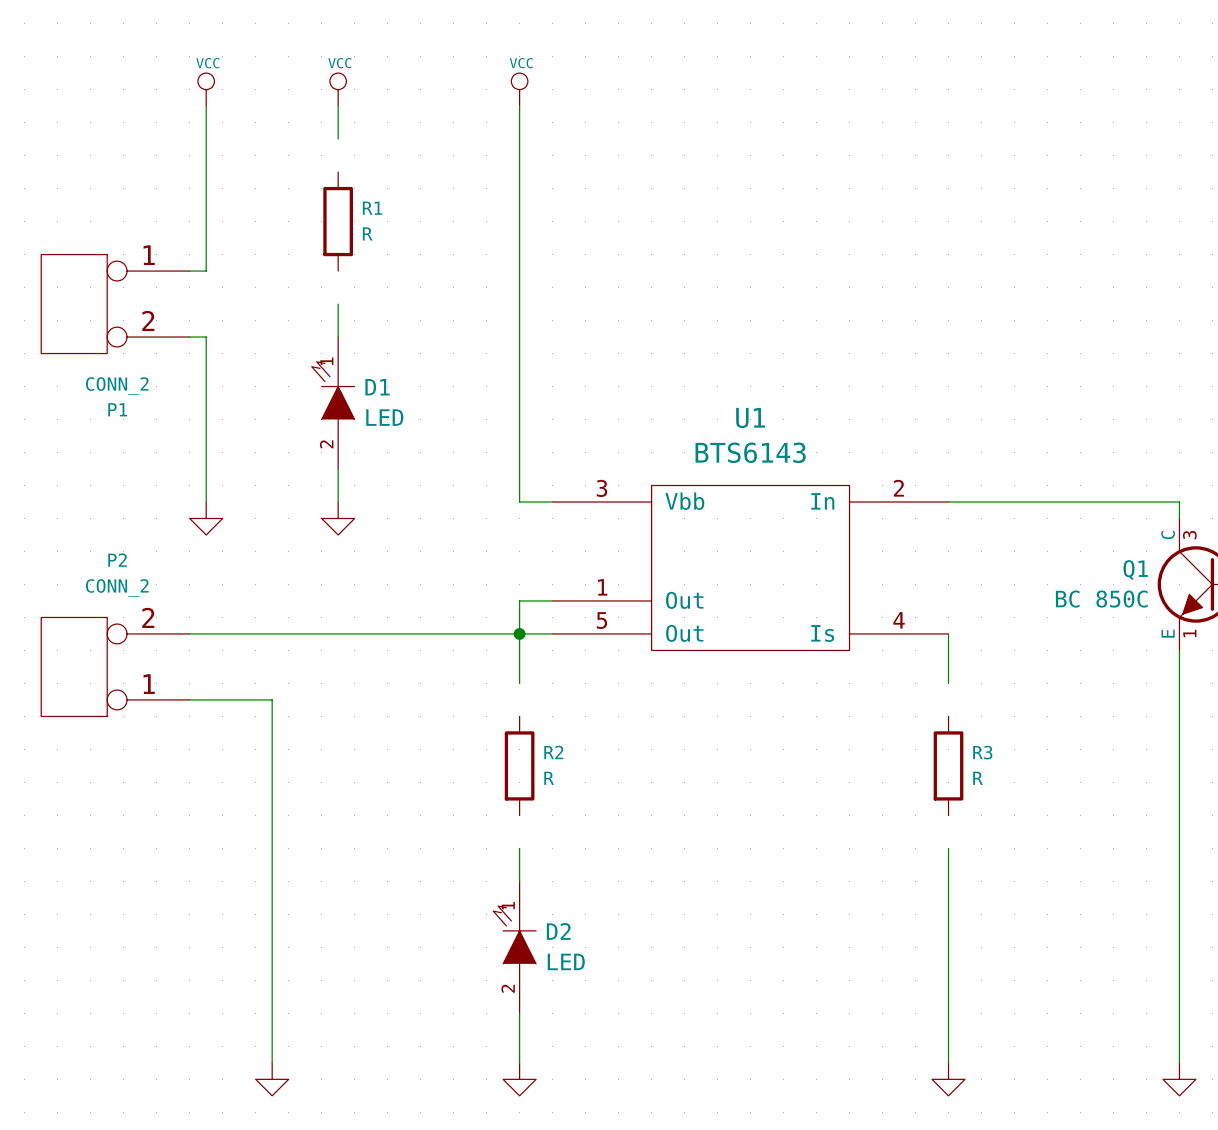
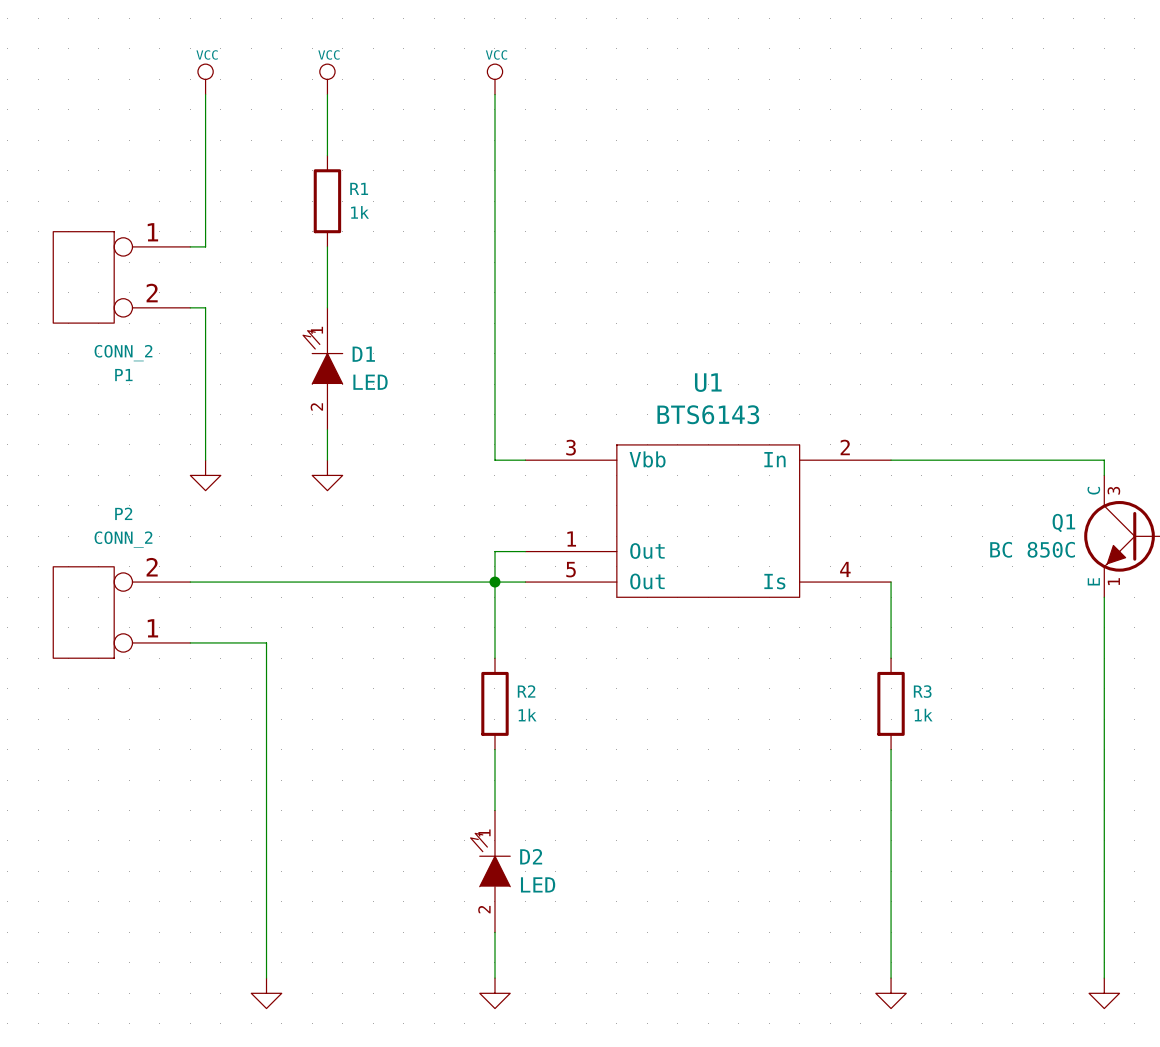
wire: none -> (327, 125) (327, 155)
R1 value: R (367, 233) -> 1k (360, 212)
wire: none -> (327, 246) (327, 277)
wire: none -> (494, 627) (494, 658)
wire: none -> (891, 627) (891, 658)
R2 value: R (549, 778) -> 1k (527, 715)
R3 value: R (978, 778) -> 1k (923, 715)
wire: none -> (494, 749) (494, 780)
wire: none -> (891, 749) (891, 780)

